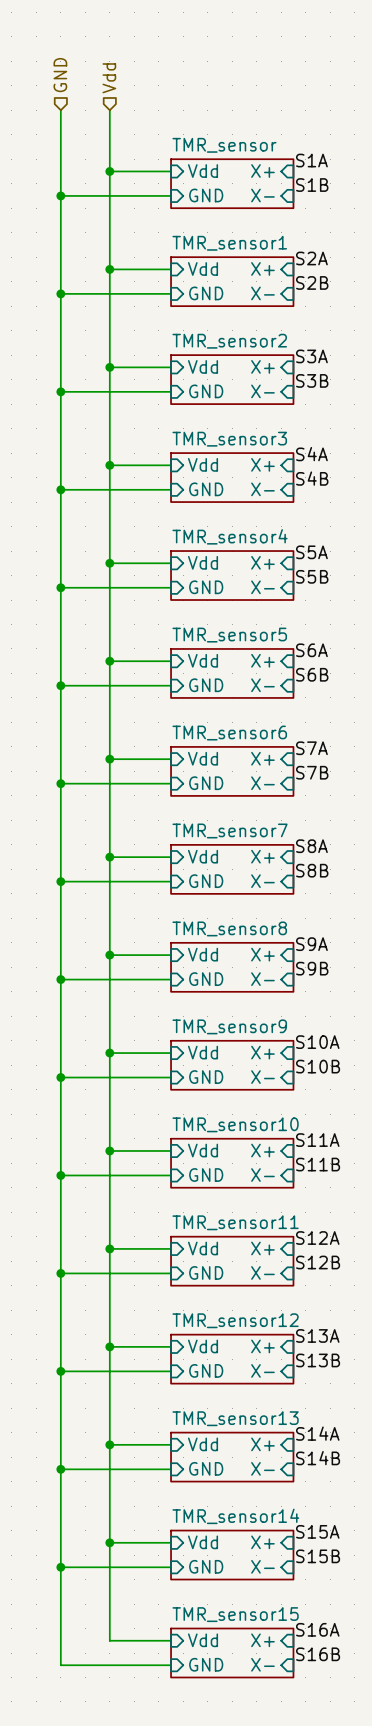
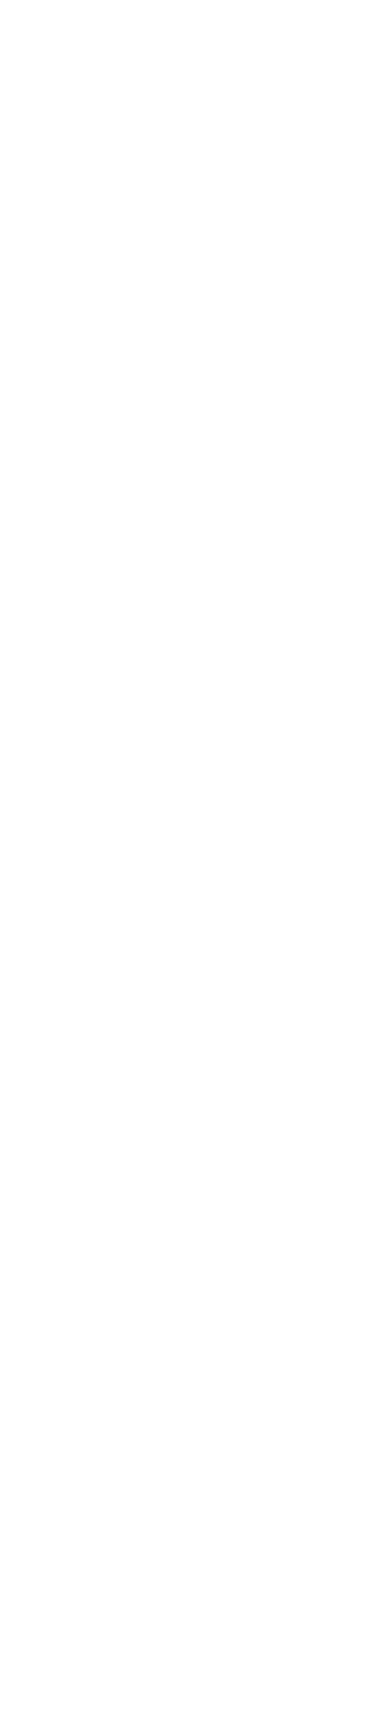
hierarchical label: GND (60, 75) -> none
hierarchical label: Vdd (109, 78) -> none
wire: (60, 110) (60, 1665) (171, 1665) -> none
wire: (109, 110) (109, 1640) (171, 1640) -> none
label: S1A (311, 160) -> none
wire: (109, 171) (171, 171) -> none
junction: (109, 171) -> none
sheet pin: Vdd (203, 171) -> none
sheet pin: X+ (262, 171) -> none
sheet TMR_sensor: (232, 183) -> none
label: S1B (312, 185) -> none
wire: (60, 195) (171, 195) -> none
junction: (60, 195) -> none
sheet pin: GND (206, 195) -> none
sheet pin: X- (262, 195) -> none
label: S2A (311, 258) -> none
sheet pin: Vdd (203, 268) -> none
sheet pin: X+ (262, 268) -> none
wire: (109, 269) (171, 269) -> none
junction: (109, 269) -> none
sheet TMR_sensor1: (232, 281) -> none
label: S2B (312, 282) -> none
wire: (60, 293) (171, 293) -> none
junction: (60, 293) -> none
sheet pin: GND (206, 293) -> none
sheet pin: X- (262, 293) -> none
label: S3A (311, 356) -> none
sheet pin: Vdd (203, 366) -> none
sheet pin: X+ (262, 366) -> none
wire: (109, 367) (171, 367) -> none
junction: (109, 367) -> none
sheet TMR_sensor2: (232, 379) -> none
label: S3B (312, 380) -> none
wire: (60, 391) (171, 391) -> none
junction: (60, 391) -> none
sheet pin: GND (206, 391) -> none
sheet pin: X- (262, 391) -> none
label: S4A (311, 454) -> none
sheet pin: Vdd (203, 464) -> none
sheet pin: X+ (262, 464) -> none
wire: (109, 465) (171, 465) -> none
junction: (109, 465) -> none
sheet TMR_sensor3: (232, 477) -> none
label: S4B (312, 478) -> none
wire: (60, 489) (171, 489) -> none
junction: (60, 489) -> none
sheet pin: GND (206, 489) -> none
sheet pin: X- (262, 489) -> none
label: S5A (311, 552) -> none
sheet pin: Vdd (203, 562) -> none
sheet pin: X+ (262, 562) -> none
wire: (109, 563) (171, 563) -> none
junction: (109, 563) -> none
sheet TMR_sensor4: (232, 575) -> none
label: S5B (312, 576) -> none
wire: (60, 587) (171, 587) -> none
junction: (60, 587) -> none
sheet pin: GND (206, 587) -> none
sheet pin: X- (262, 587) -> none
label: S6A (311, 650) -> none
sheet pin: Vdd (203, 660) -> none
sheet pin: X+ (262, 660) -> none
wire: (109, 661) (171, 661) -> none
junction: (109, 661) -> none
sheet TMR_sensor5: (232, 673) -> none
label: S6B (312, 674) -> none
wire: (60, 685) (171, 685) -> none
junction: (60, 685) -> none
sheet pin: GND (206, 685) -> none
sheet pin: X- (262, 685) -> none
label: S7A (311, 748) -> none
sheet pin: Vdd (203, 758) -> none
sheet pin: X+ (262, 758) -> none
wire: (109, 759) (171, 759) -> none
junction: (109, 759) -> none
sheet TMR_sensor6: (232, 771) -> none
label: S7B (312, 772) -> none
wire: (60, 783) (171, 783) -> none
junction: (60, 783) -> none
sheet pin: GND (206, 783) -> none
sheet pin: X- (262, 783) -> none
label: S8A (311, 846) -> none
sheet pin: Vdd (203, 856) -> none
sheet pin: X+ (262, 856) -> none
wire: (109, 857) (171, 857) -> none
junction: (109, 857) -> none
sheet TMR_sensor7: (232, 869) -> none
label: S8B (312, 870) -> none
wire: (60, 881) (171, 881) -> none
junction: (60, 881) -> none
sheet pin: GND (206, 881) -> none
sheet pin: X- (262, 881) -> none
label: S9A (311, 944) -> none
sheet pin: Vdd (203, 954) -> none
sheet pin: X+ (262, 954) -> none
wire: (109, 955) (171, 955) -> none
junction: (109, 955) -> none
sheet TMR_sensor8: (232, 967) -> none
label: S9B (312, 968) -> none
wire: (60, 979) (171, 979) -> none
junction: (60, 979) -> none
sheet pin: GND (206, 979) -> none
sheet pin: X- (262, 979) -> none
label: S10A (317, 1042) -> none
sheet pin: Vdd (203, 1052) -> none
sheet pin: X+ (262, 1052) -> none
wire: (109, 1053) (171, 1053) -> none
junction: (109, 1053) -> none
sheet TMR_sensor9: (232, 1065) -> none
label: S10B (318, 1066) -> none
wire: (60, 1077) (171, 1077) -> none
junction: (60, 1077) -> none
sheet pin: GND (206, 1077) -> none
sheet pin: X- (262, 1077) -> none
label: S11A (317, 1140) -> none
wire: (109, 1150) (171, 1150) -> none
junction: (109, 1150) -> none
sheet pin: Vdd (203, 1150) -> none
sheet pin: X+ (262, 1150) -> none
sheet TMR_sensor10: (232, 1163) -> none
label: S11B (318, 1164) -> none
wire: (60, 1175) (171, 1175) -> none
junction: (60, 1175) -> none
sheet pin: GND (206, 1175) -> none
sheet pin: X- (262, 1175) -> none
label: S12A (317, 1238) -> none
wire: (109, 1248) (171, 1248) -> none
junction: (109, 1248) -> none
sheet pin: Vdd (203, 1248) -> none
sheet pin: X+ (262, 1248) -> none
sheet TMR_sensor11: (232, 1261) -> none
label: S12B (318, 1262) -> none
sheet pin: GND (206, 1272) -> none
sheet pin: X- (262, 1272) -> none
wire: (60, 1273) (171, 1273) -> none
junction: (60, 1273) -> none
label: S13A (317, 1335) -> none
wire: (109, 1346) (171, 1346) -> none
junction: (109, 1346) -> none
sheet pin: Vdd (203, 1346) -> none
sheet pin: X+ (262, 1346) -> none
sheet TMR_sensor12: (232, 1359) -> none
label: S13B (318, 1360) -> none
sheet pin: GND (206, 1370) -> none
sheet pin: X- (262, 1370) -> none
wire: (60, 1371) (171, 1371) -> none
junction: (60, 1371) -> none
label: S14A (317, 1433) -> none
wire: (109, 1444) (171, 1444) -> none
junction: (109, 1444) -> none
sheet pin: Vdd (203, 1444) -> none
sheet pin: X+ (262, 1444) -> none
sheet TMR_sensor13: (232, 1457) -> none
label: S14B (318, 1458) -> none
sheet pin: GND (206, 1468) -> none
sheet pin: X- (262, 1468) -> none
wire: (60, 1469) (171, 1469) -> none
junction: (60, 1469) -> none
label: S15A (317, 1531) -> none
wire: (109, 1542) (171, 1542) -> none
junction: (109, 1542) -> none
sheet pin: Vdd (203, 1542) -> none
sheet pin: X+ (262, 1542) -> none
sheet TMR_sensor14: (232, 1555) -> none
label: S15B (318, 1556) -> none
sheet pin: GND (206, 1566) -> none
sheet pin: X- (262, 1566) -> none
wire: (60, 1567) (171, 1567) -> none
junction: (60, 1567) -> none
label: S16A (317, 1629) -> none
sheet pin: Vdd (203, 1640) -> none
sheet pin: X+ (262, 1640) -> none
sheet TMR_sensor15: (232, 1653) -> none
label: S16B (318, 1654) -> none
sheet pin: GND (206, 1664) -> none
sheet pin: X- (262, 1664) -> none

